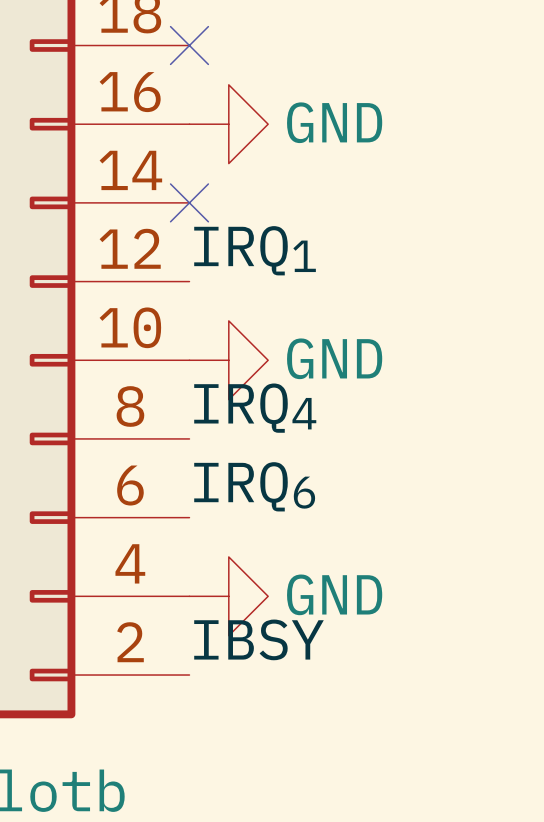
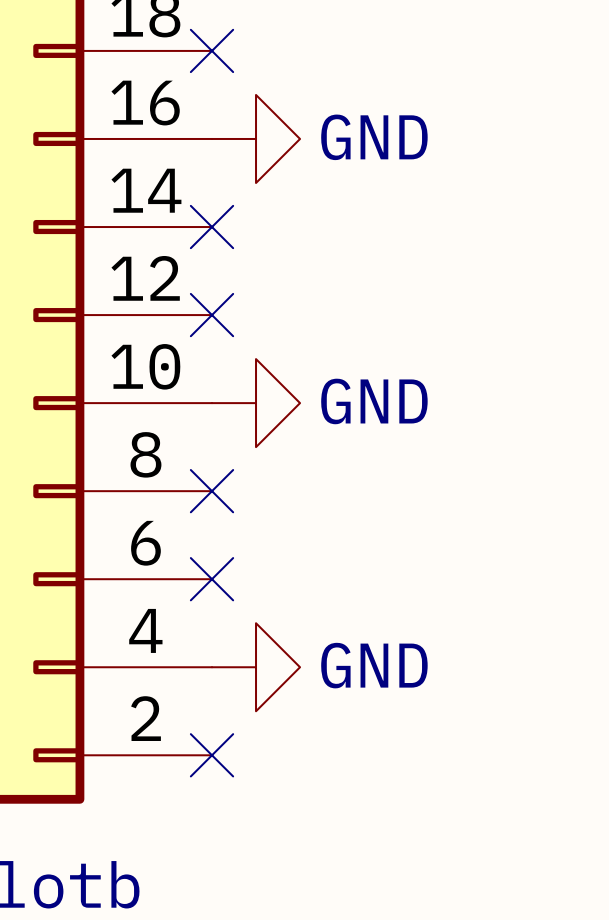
label: IRQ1 (255, 250) -> none
no-connect mark: none -> (212, 315)
label: IRQ4 (255, 408) -> none
no-connect mark: none -> (212, 491)
label: IRQ6 (254, 486) -> none
no-connect mark: none -> (212, 579)
label: IBSY (259, 639) -> none
no-connect mark: none -> (212, 755)

